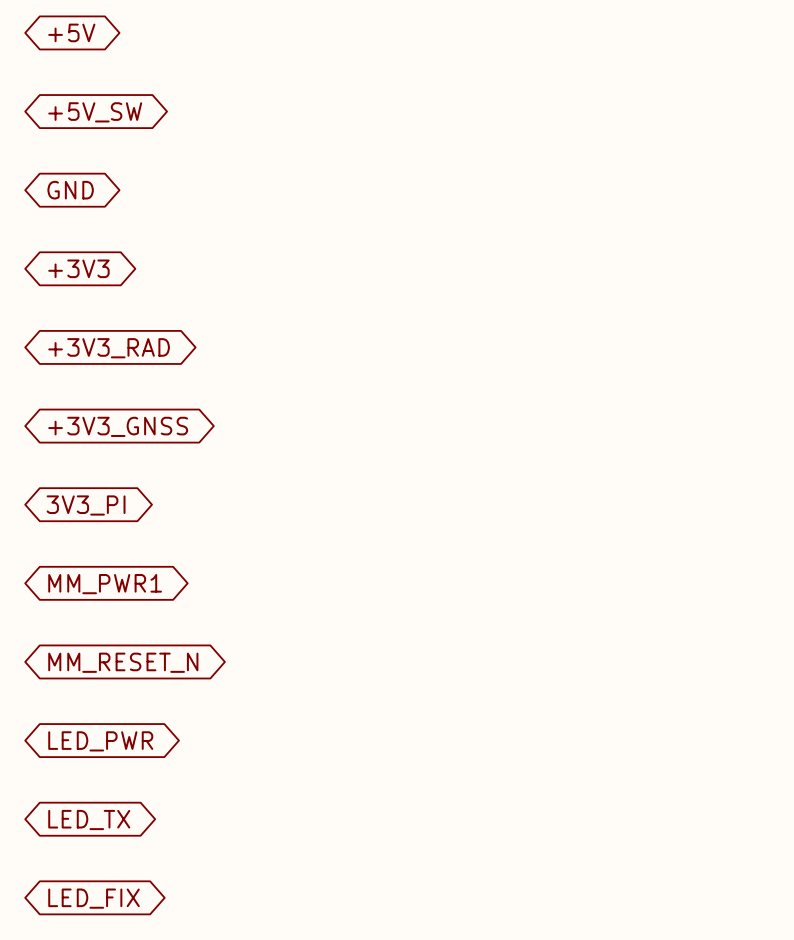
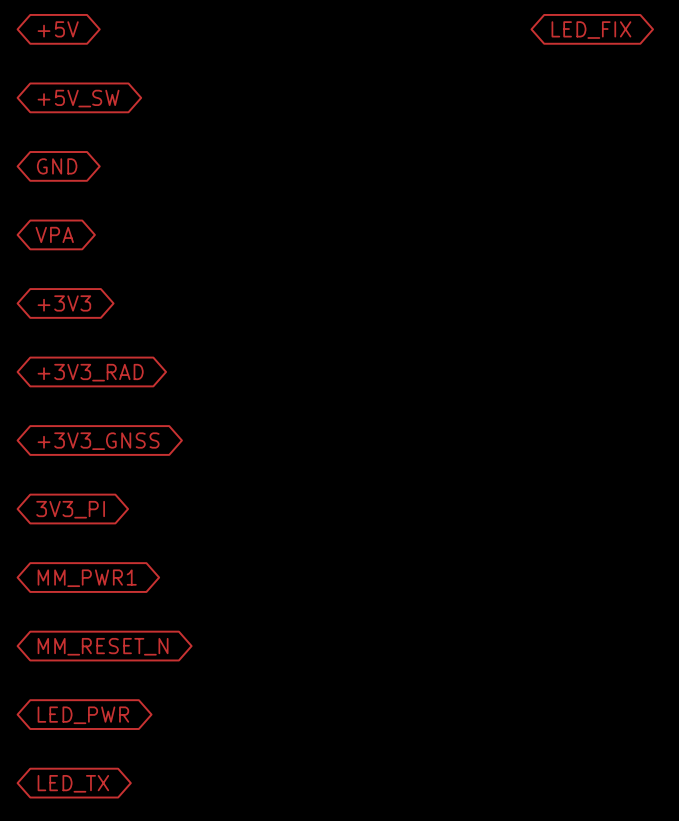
global label: none -> LED_FIX (591, 30)
global label: +3V3 (78, 268) -> VPA (54, 234)
global label: +3V3_RAD (109, 348) -> +3V3 (64, 303)
global label: +3V3_GNSS (118, 426) -> +3V3_RAD (90, 372)
global label: 3V3_PI (86, 505) -> +3V3_GNSS (98, 441)
global label: MM_PWR1 (105, 584) -> 3V3_PI (70, 509)
global label: MM_RESET_N (123, 662) -> MM_PWR1 (87, 578)
global label: LED_PWR (100, 741) -> MM_RESET_N (103, 646)
global label: LED_TX (89, 820) -> LED_PWR (83, 715)
global label: LED_FIX (94, 898) -> LED_TX (73, 783)

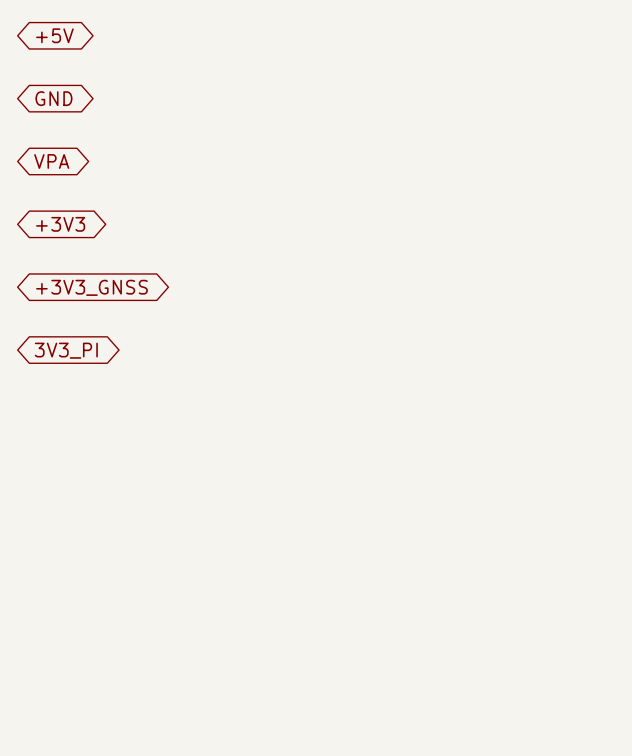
global label: LED_FIX (591, 30) -> none
global label: +5V_SW (78, 98) -> GND (53, 98)
global label: GND (57, 166) -> VPA (51, 161)
global label: VPA (54, 234) -> +3V3 (60, 224)
global label: +3V3 (64, 303) -> +3V3_GNSS (91, 287)
global label: +3V3_RAD (90, 372) -> 3V3_PI (66, 350)
global label: +3V3_GNSS (98, 441) -> none
global label: 3V3_PI (70, 509) -> none
global label: MM_PWR1 (87, 578) -> none
global label: MM_RESET_N (103, 646) -> none
global label: LED_PWR (83, 715) -> none
global label: LED_TX (73, 783) -> none

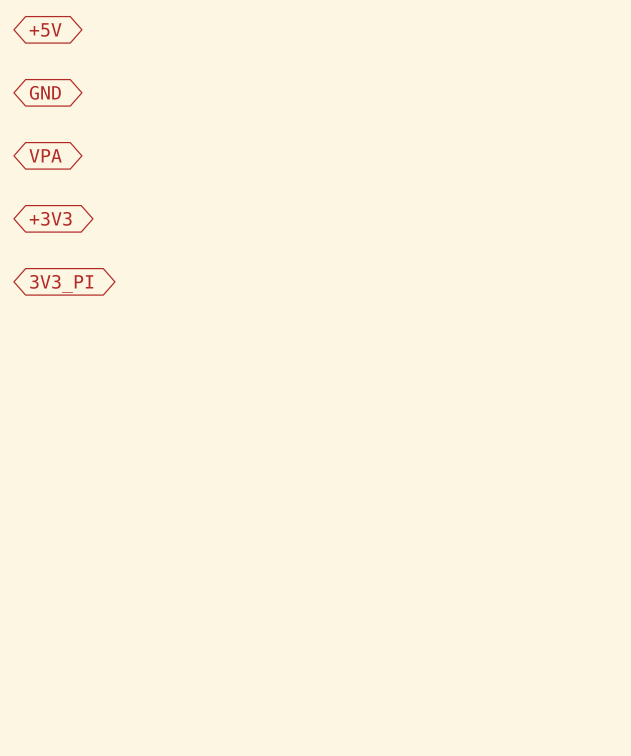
global label: +3V3_GNSS (91, 287) -> 3V3_PI (61, 283)
global label: 3V3_PI (66, 350) -> none

